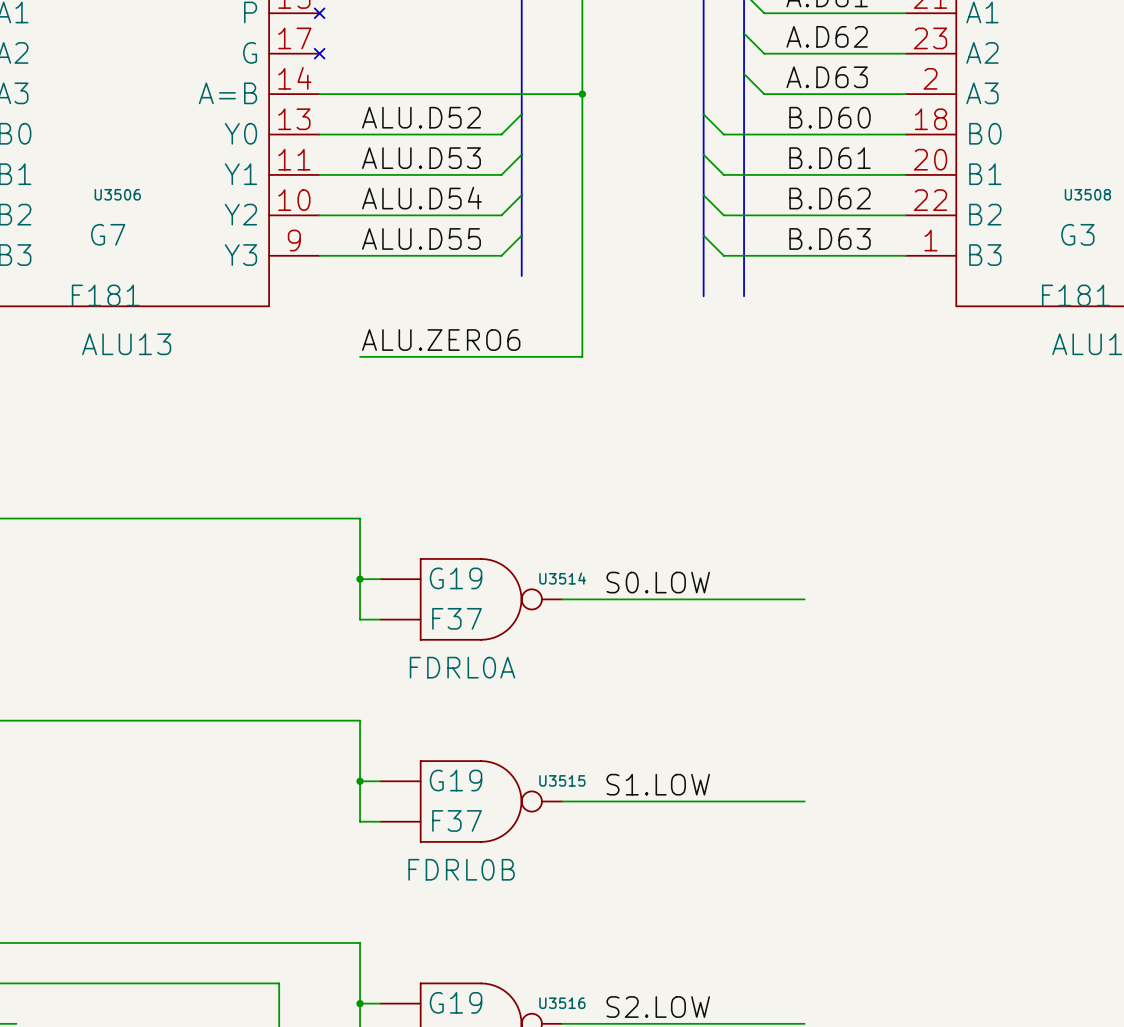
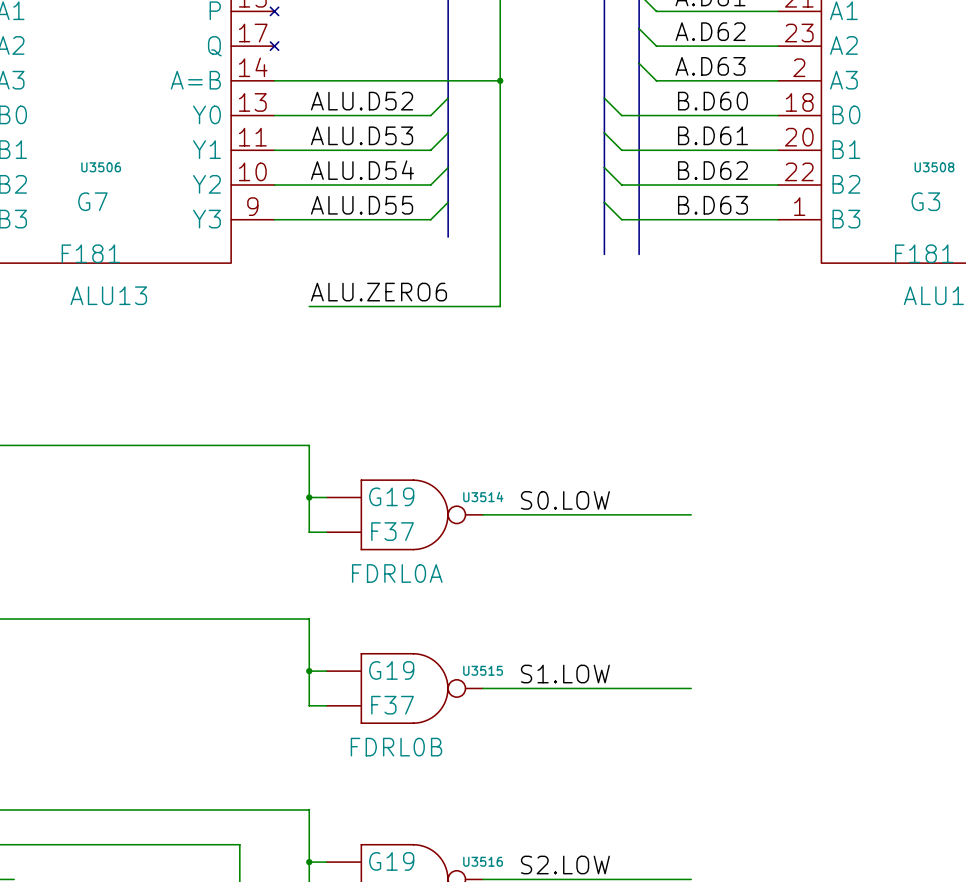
U3506 pin name: G (250, 52) -> Q (214, 46)

